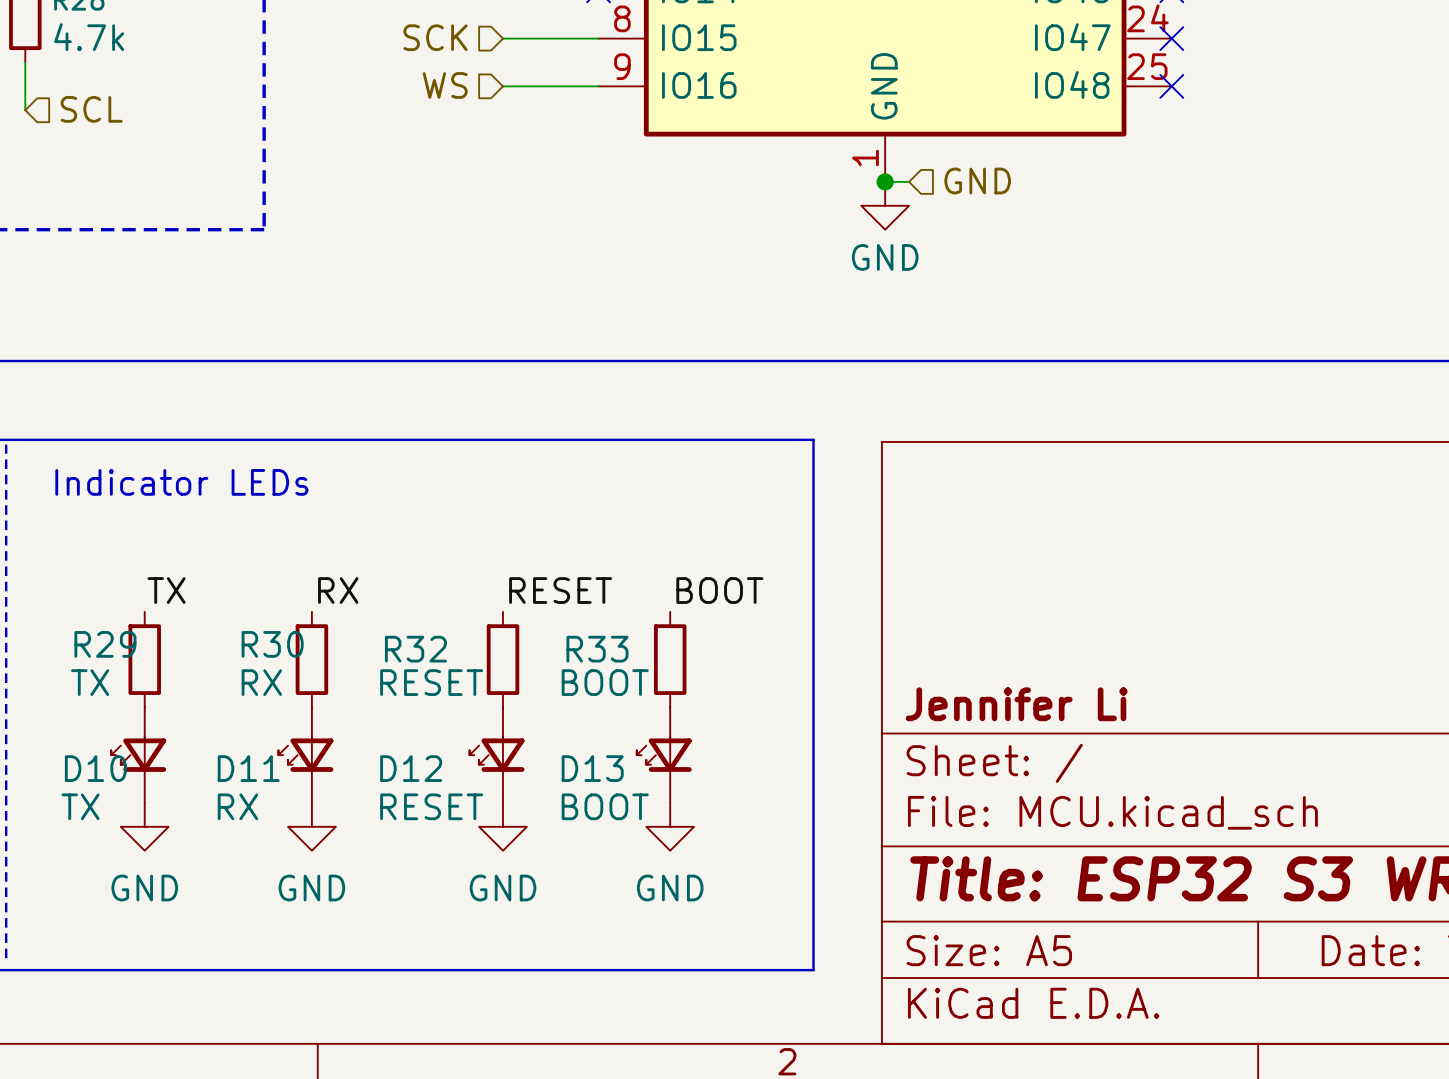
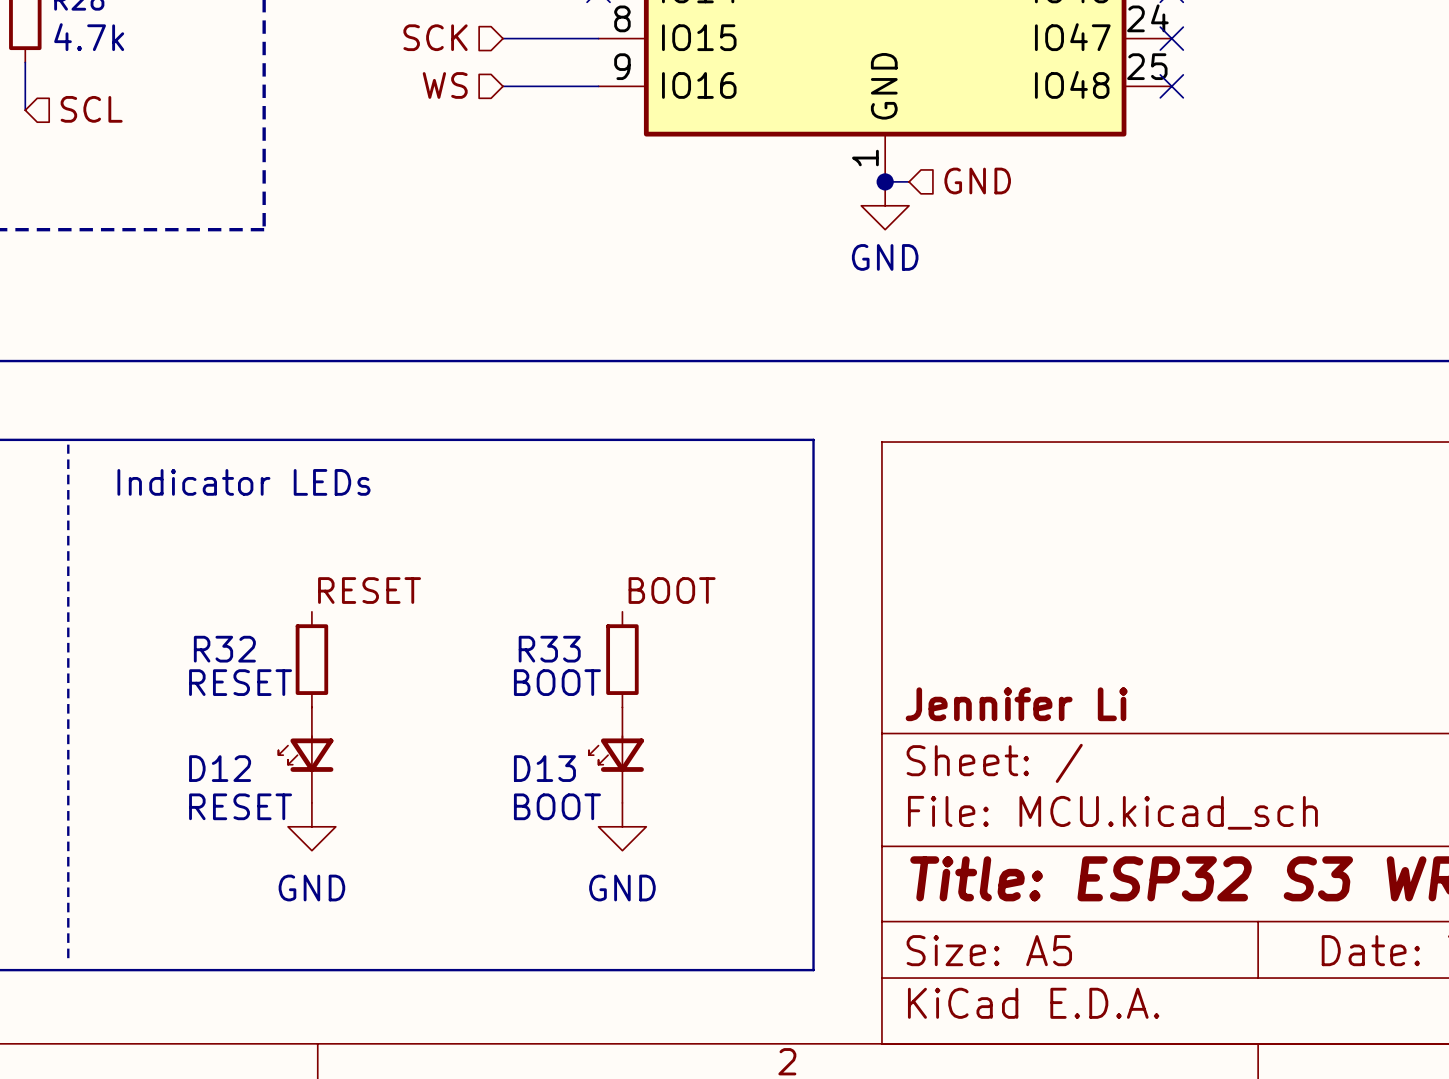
line: (6, 444) (6, 958) -> (68, 444) (68, 958)
text position: Indicator LEDs (181, 482) -> Indicator LEDs (243, 482)
label: TX (166, 590) -> none
label: RX (338, 590) -> RESET (369, 590)
label: RESET (560, 590) -> none
label position: BOOT (719, 590) -> BOOT (672, 590)
R30 name: R30 (272, 644) -> R32 (224, 649)
R29: TX (144, 659) -> none
R32: RESET (503, 659) -> none
R33 position: (670, 659) -> (622, 659)
R30 value: RX (261, 682) -> RESET (240, 682)
D10: TX (138, 755) -> none
D12: RESET (497, 755) -> none
D13 position: (664, 755) -> (616, 755)
D11 name: D11 (248, 768) -> D12 (220, 768)
D11 value: RX (237, 806) -> RESET (240, 806)
power symbol: GND (144, 826) -> none
power symbol: GND (503, 826) -> none
power symbol position: GND (670, 826) -> GND (622, 826)

